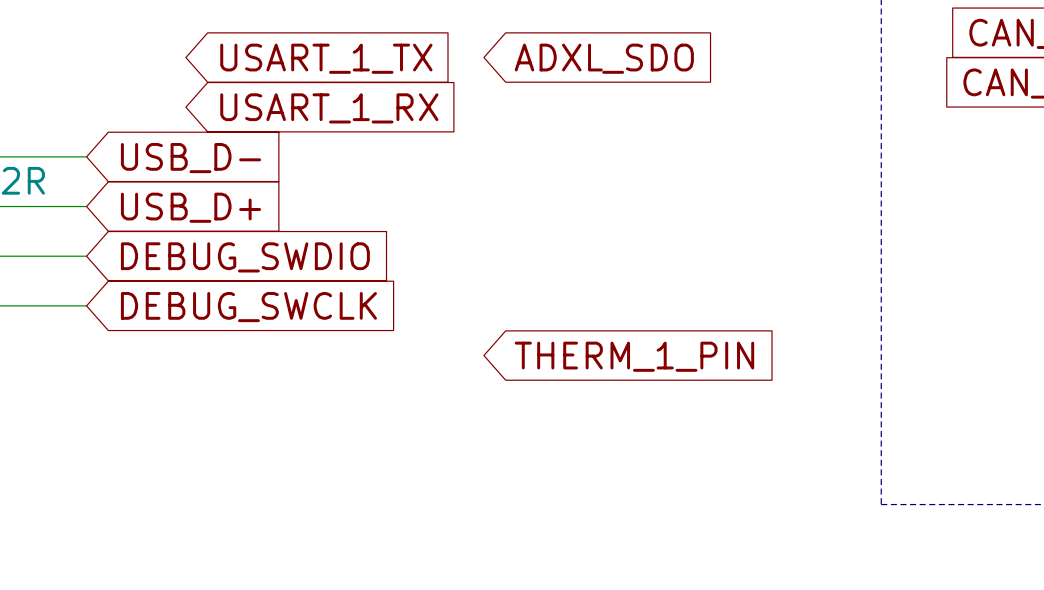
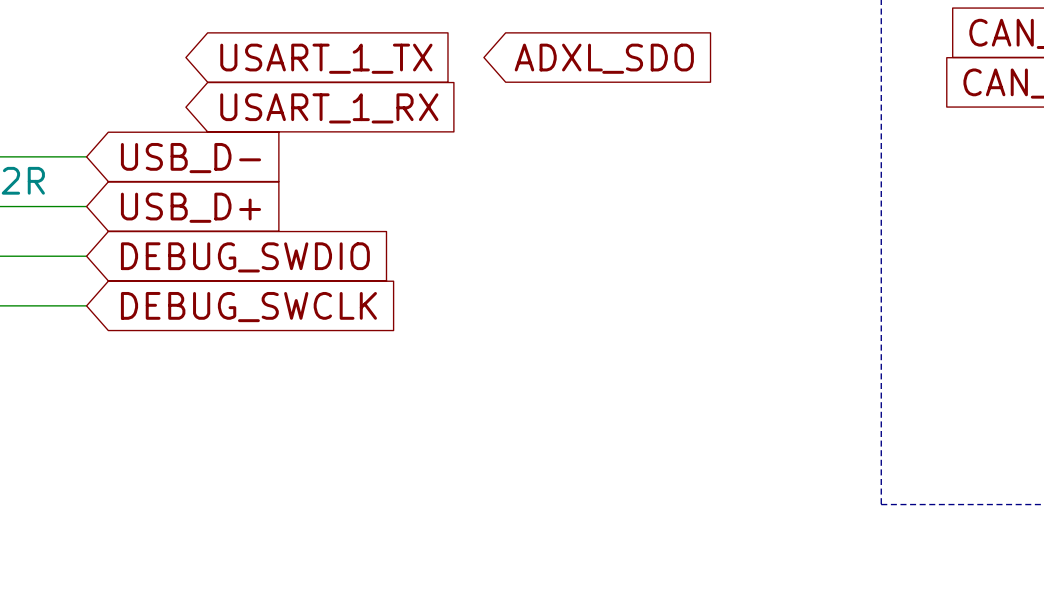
global label: THERM_1_PIN (634, 356) -> none

